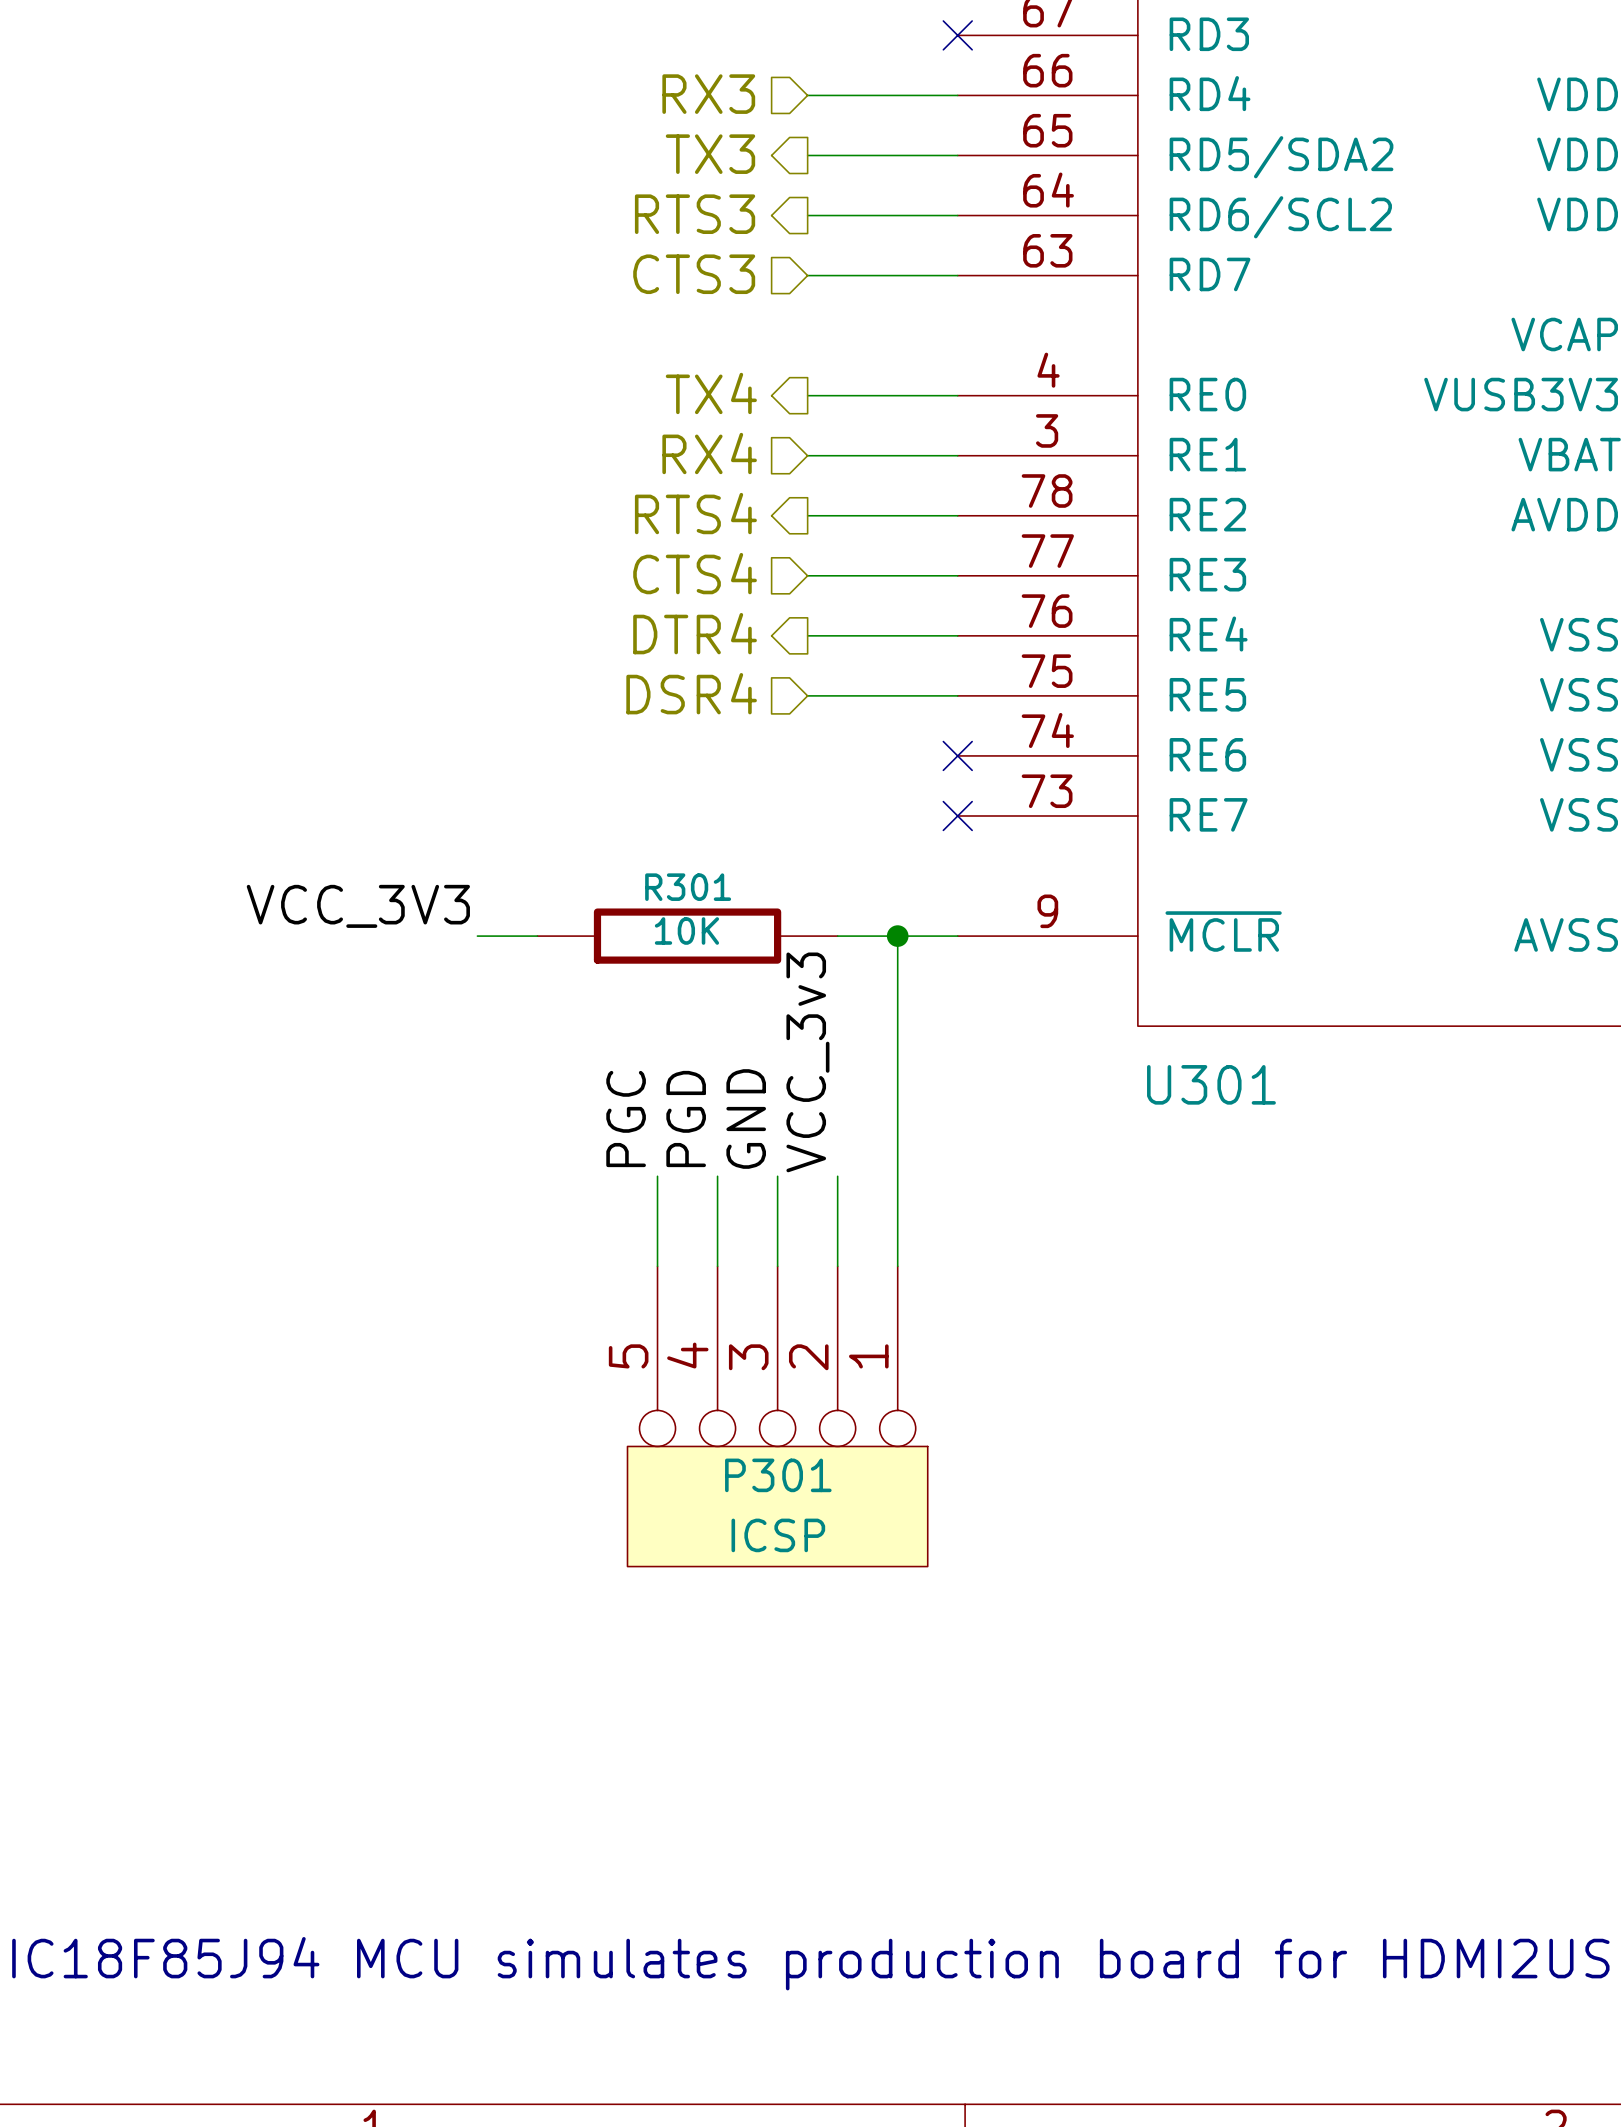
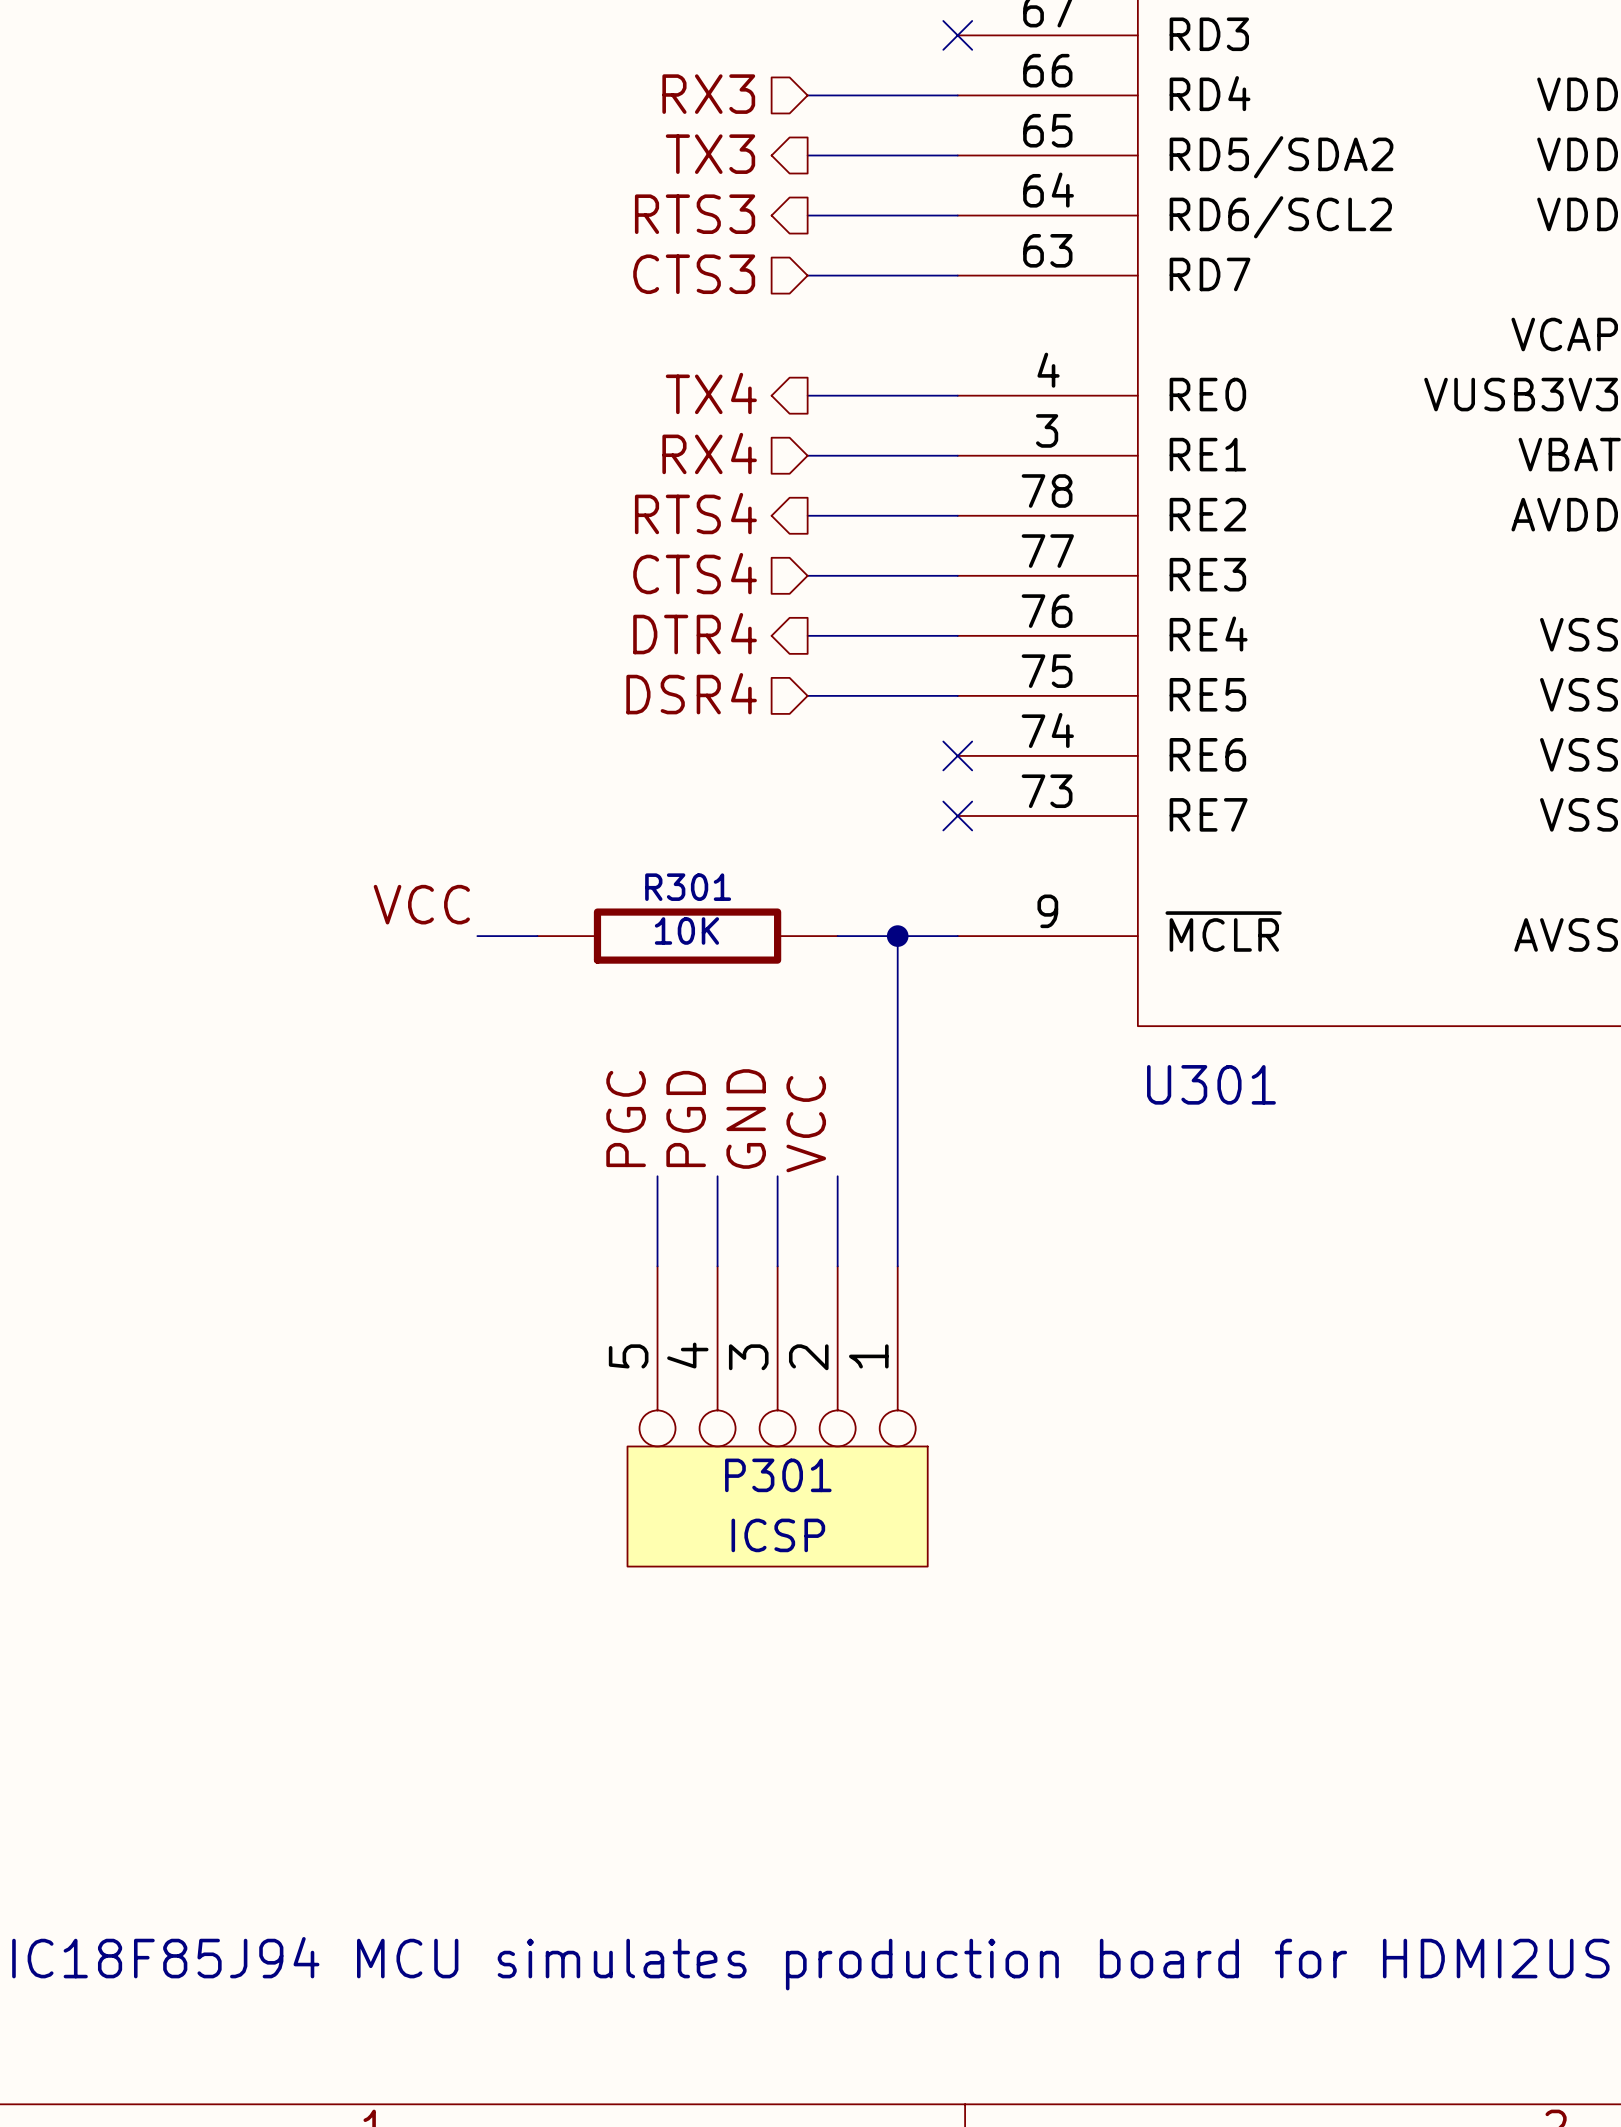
label: VCC_3V3 (358, 906) -> VCC (421, 904)
label: VCC_3v3 (807, 1062) -> VCC (806, 1124)

